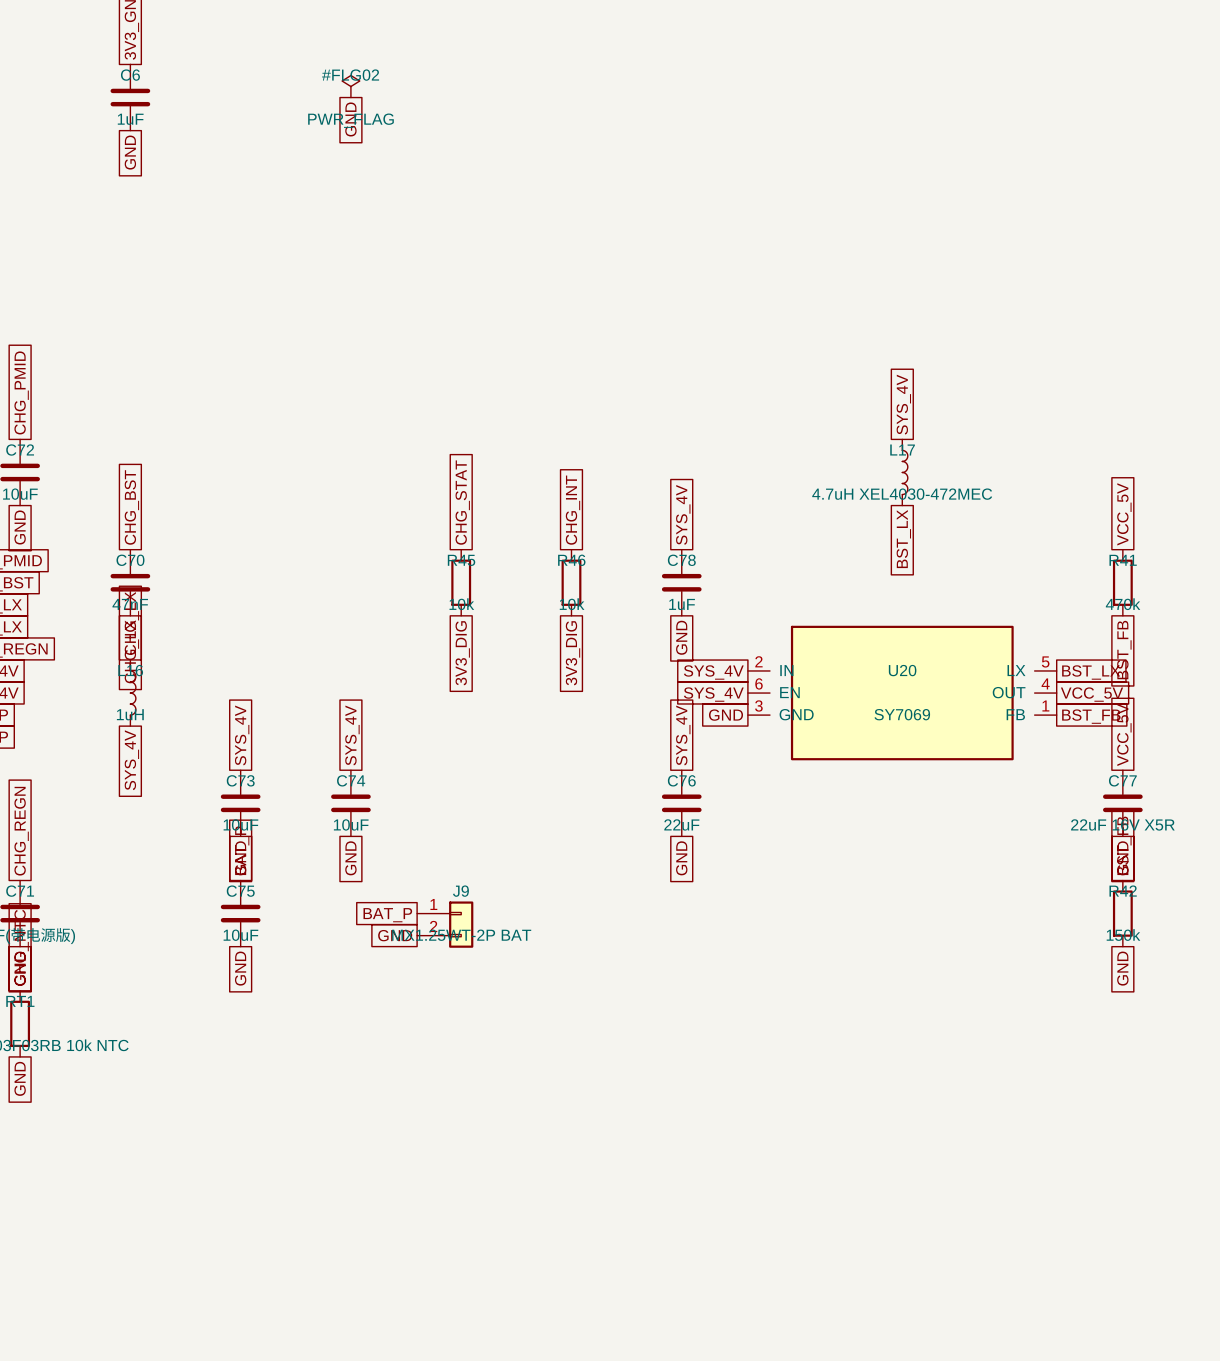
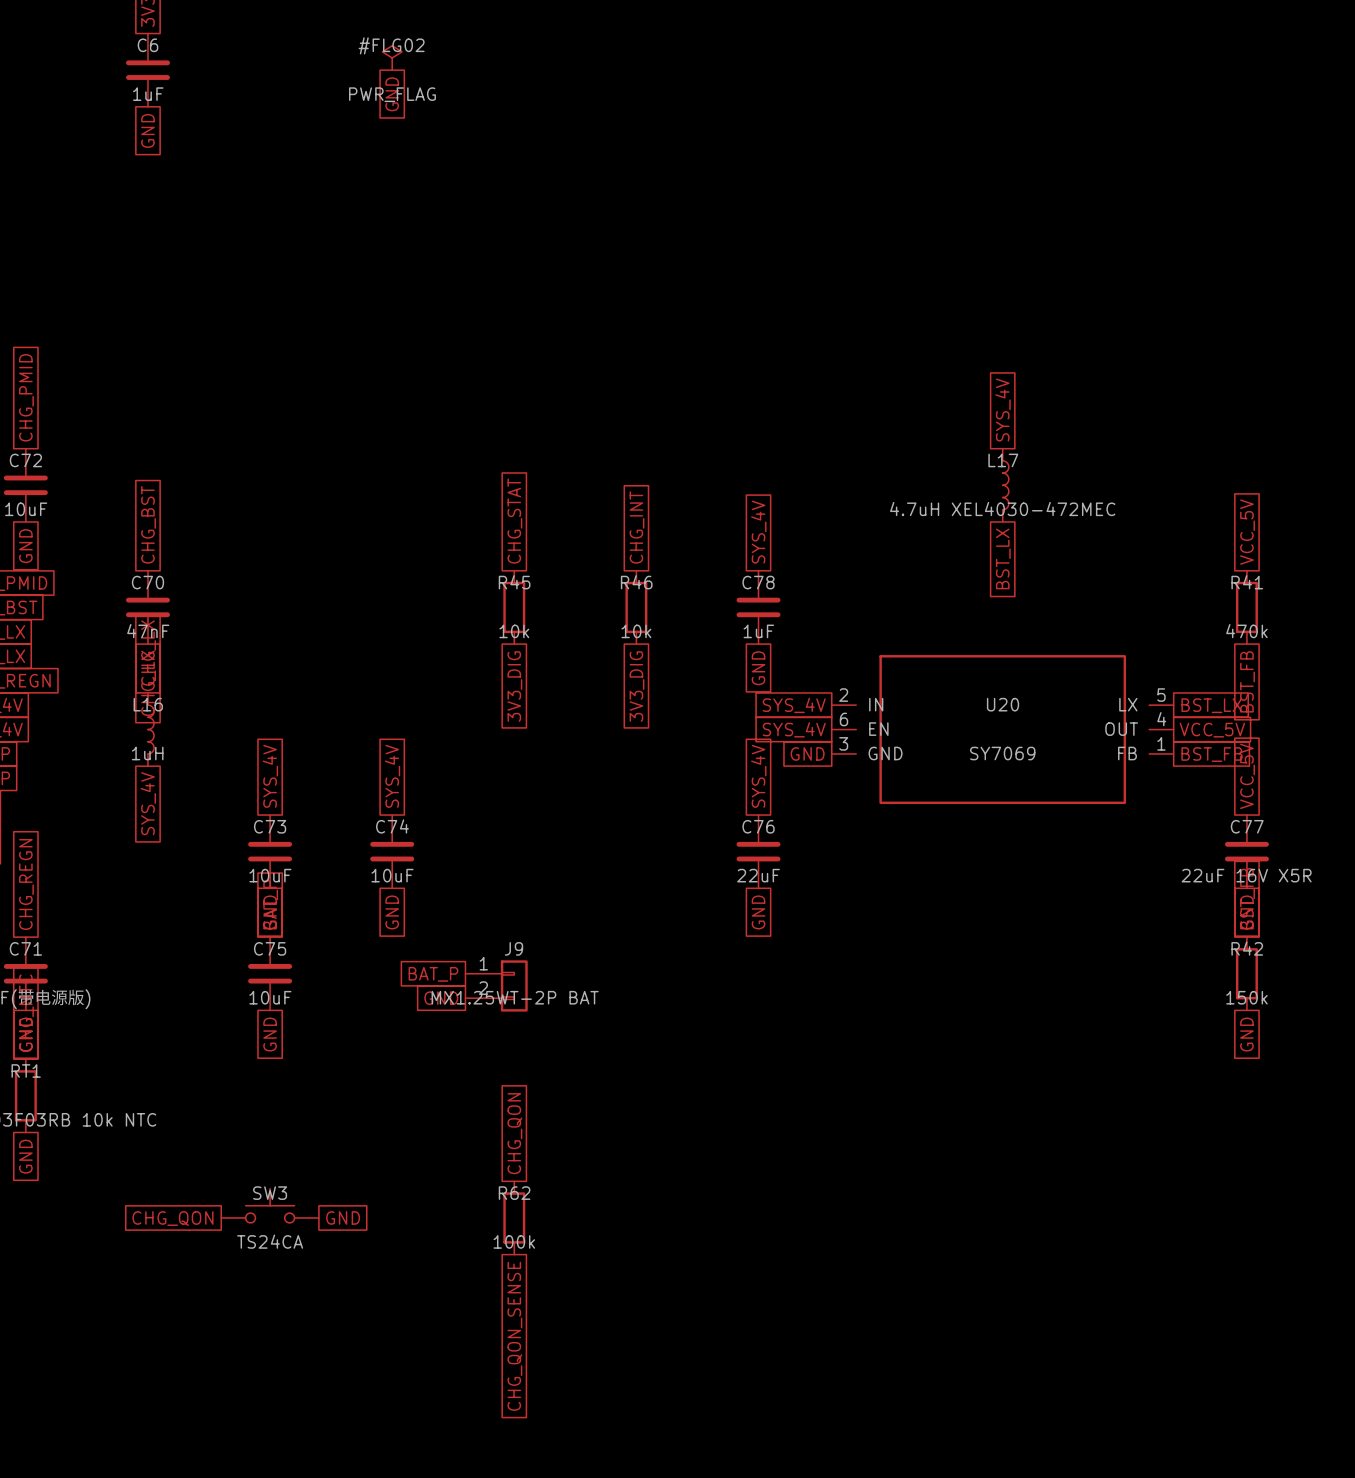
global label: none -> CHG_QON (514, 1133)
SW3: none -> TS24CA (270, 1205)
global label: none -> GND (343, 1217)
R62: none -> 100k (514, 1217)
global label: none -> CHG_QON (172, 1218)
global label: none -> CHG_QON_SENSE (514, 1336)

